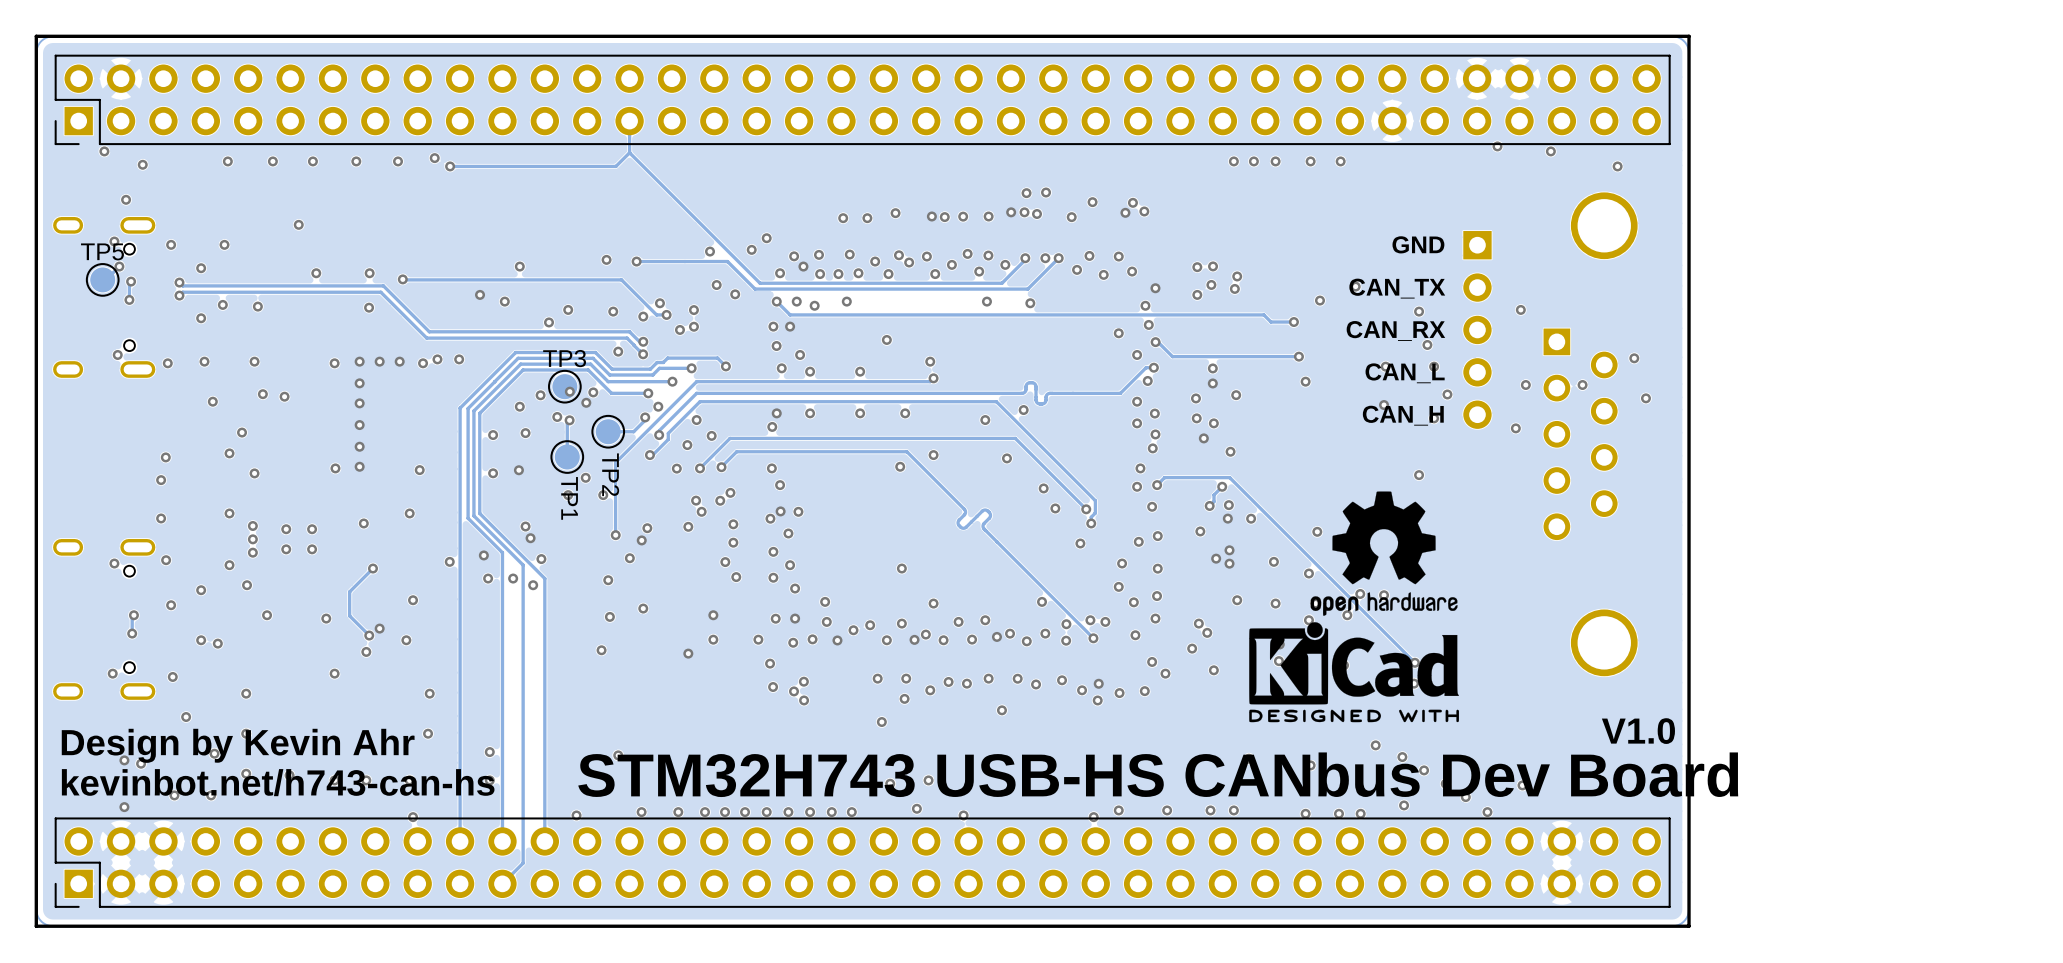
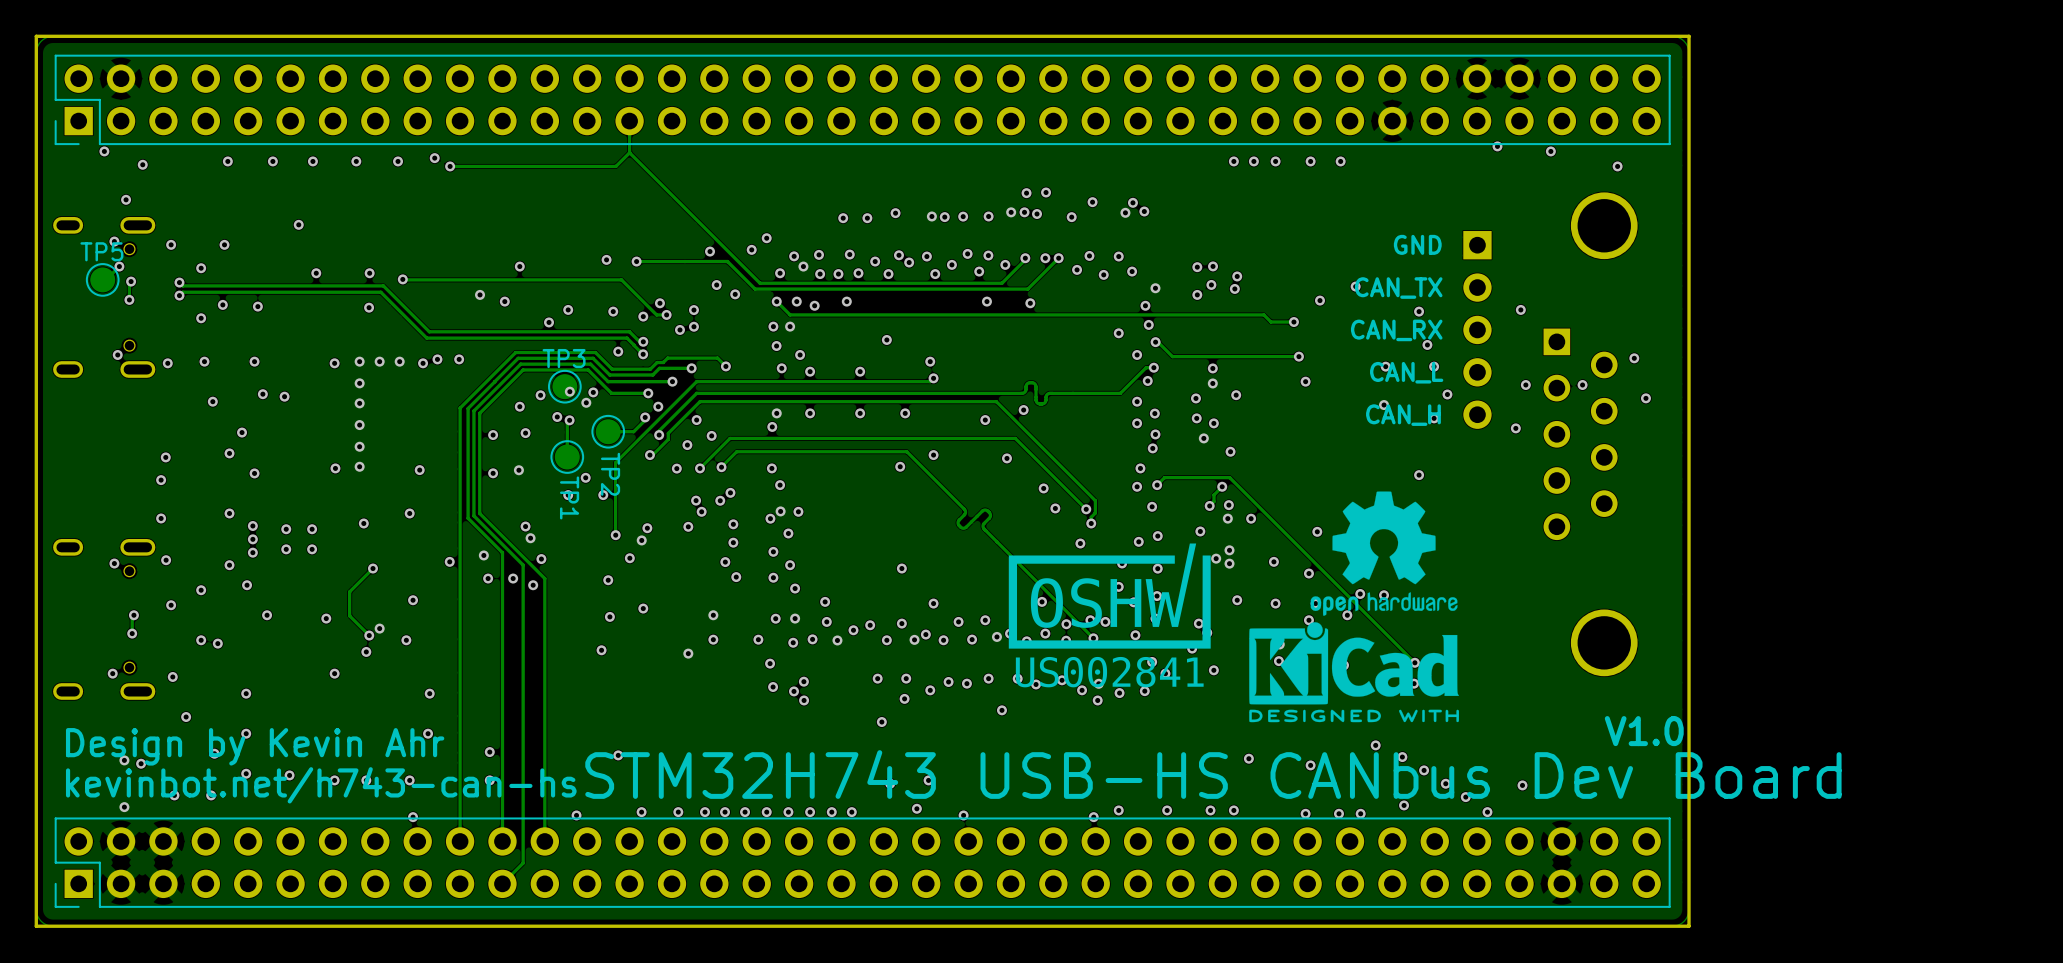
drawing: none -> [1008, 543, 1211, 688]

